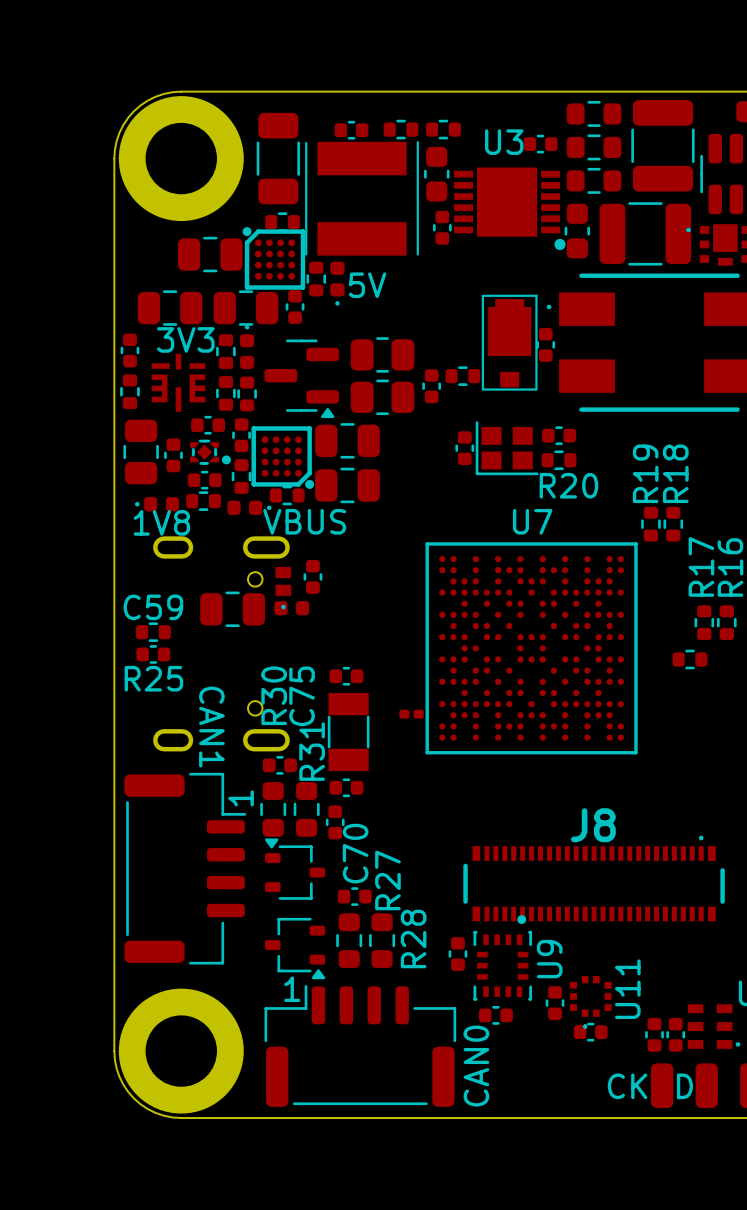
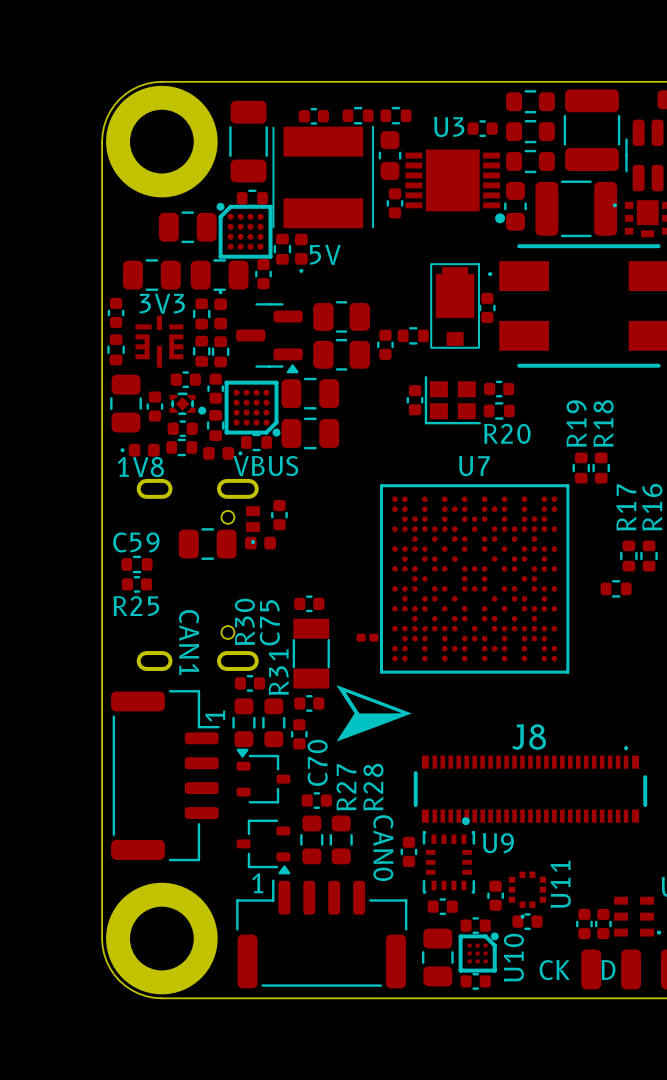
drawing: none -> [336, 685, 412, 742]
R28 name position: R28 (413, 938) -> R28 (373, 787)
U9 name rotation: 0° (549, 959) -> 90° clockwise (498, 843)
part: none -> (475, 925)
text rotation: 0° (476, 1066) -> 180° (383, 848)
text position: CAN0 (476, 1066) -> CAN0 (383, 848)
U10: none -> (478, 952)
part: none -> (437, 957)
part: none -> (475, 981)

